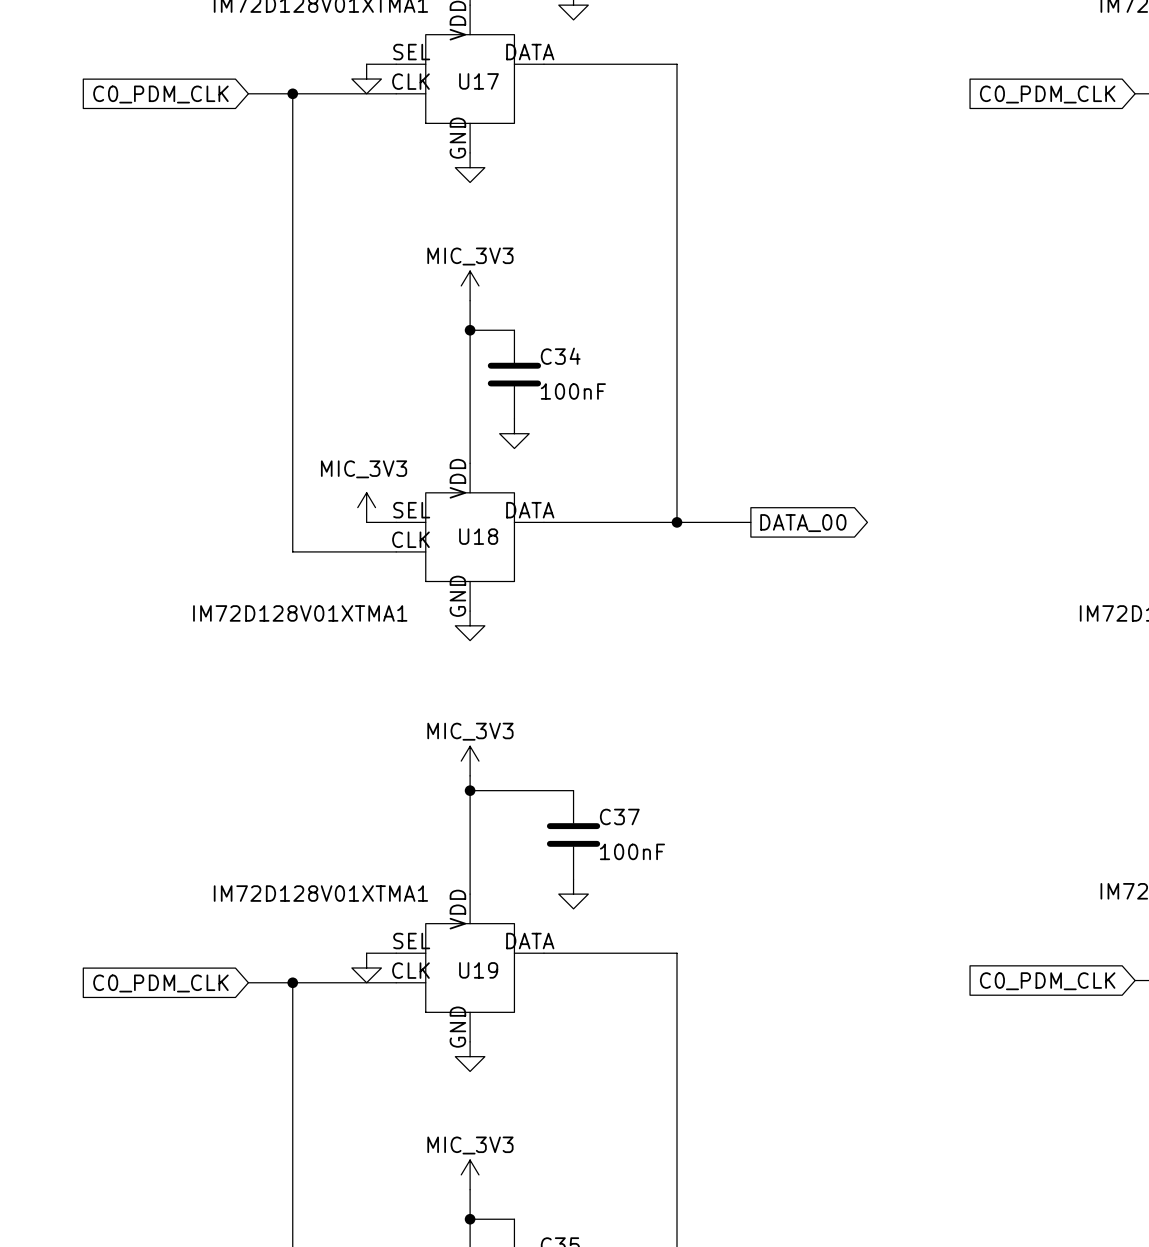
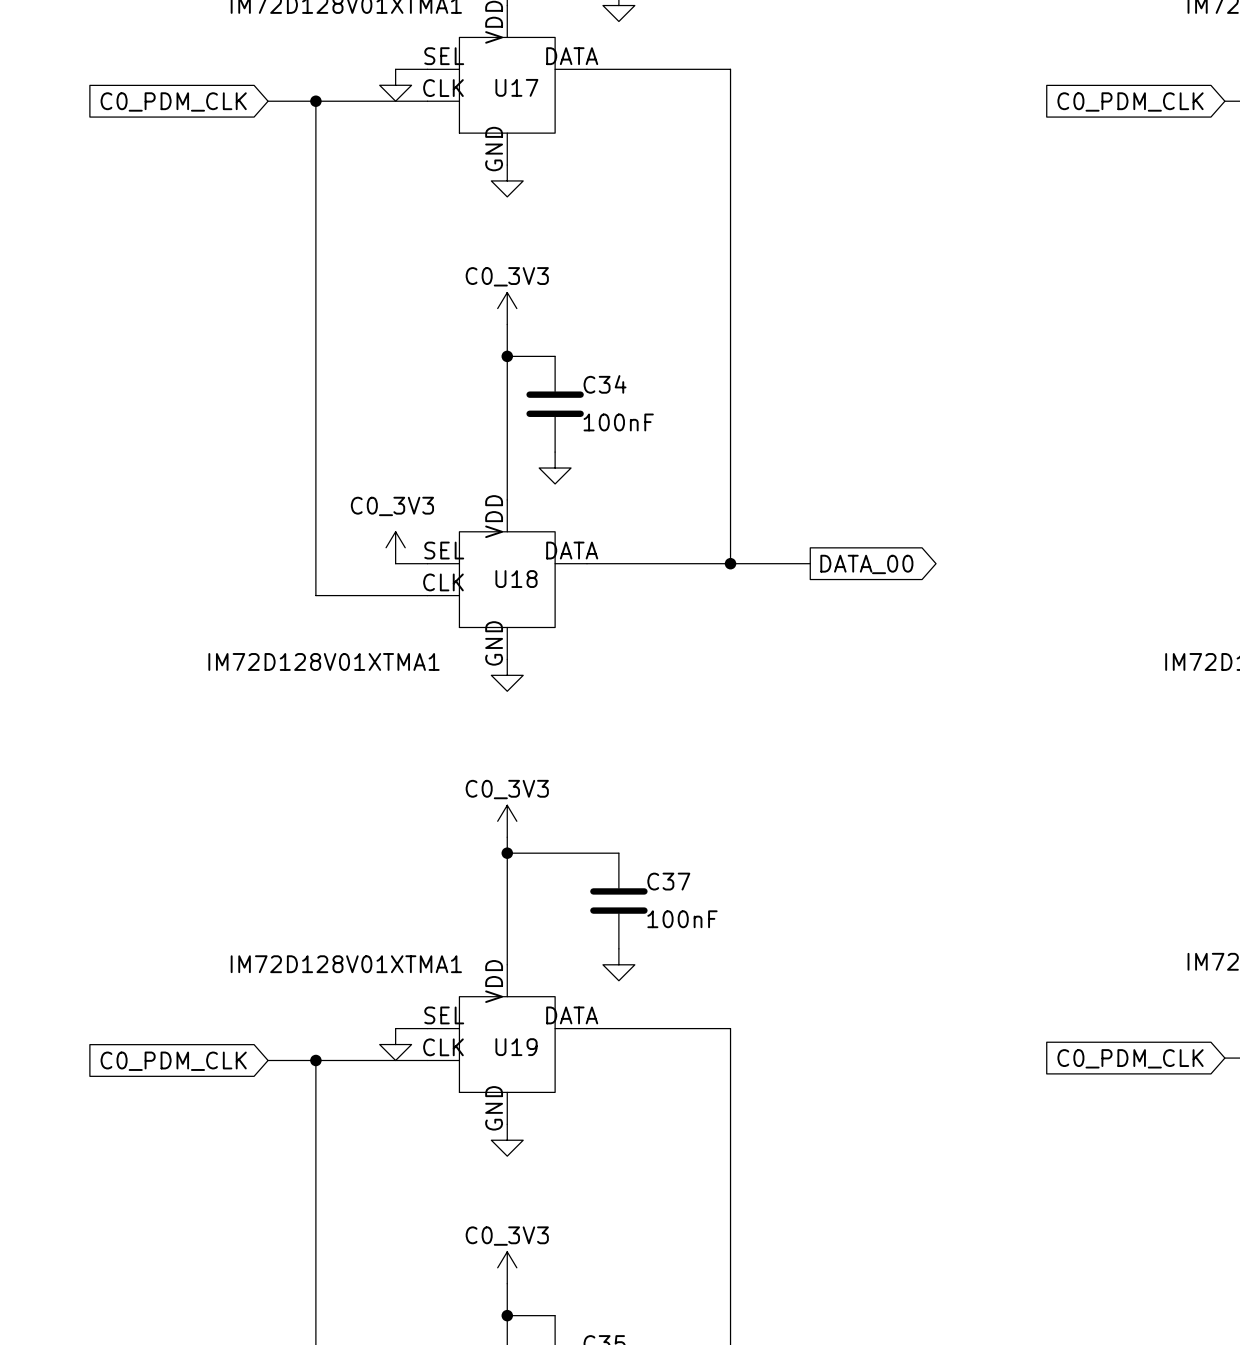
power symbol: MIC_3V3 (470, 285) -> C0_3V3 (507, 308)
power symbol: MIC_3V3 (366, 507) -> C0_3V3 (395, 547)
power symbol: MIC_3V3 (470, 761) -> C0_3V3 (507, 821)
power symbol: MIC_3V3 (470, 1174) -> C0_3V3 (507, 1267)

